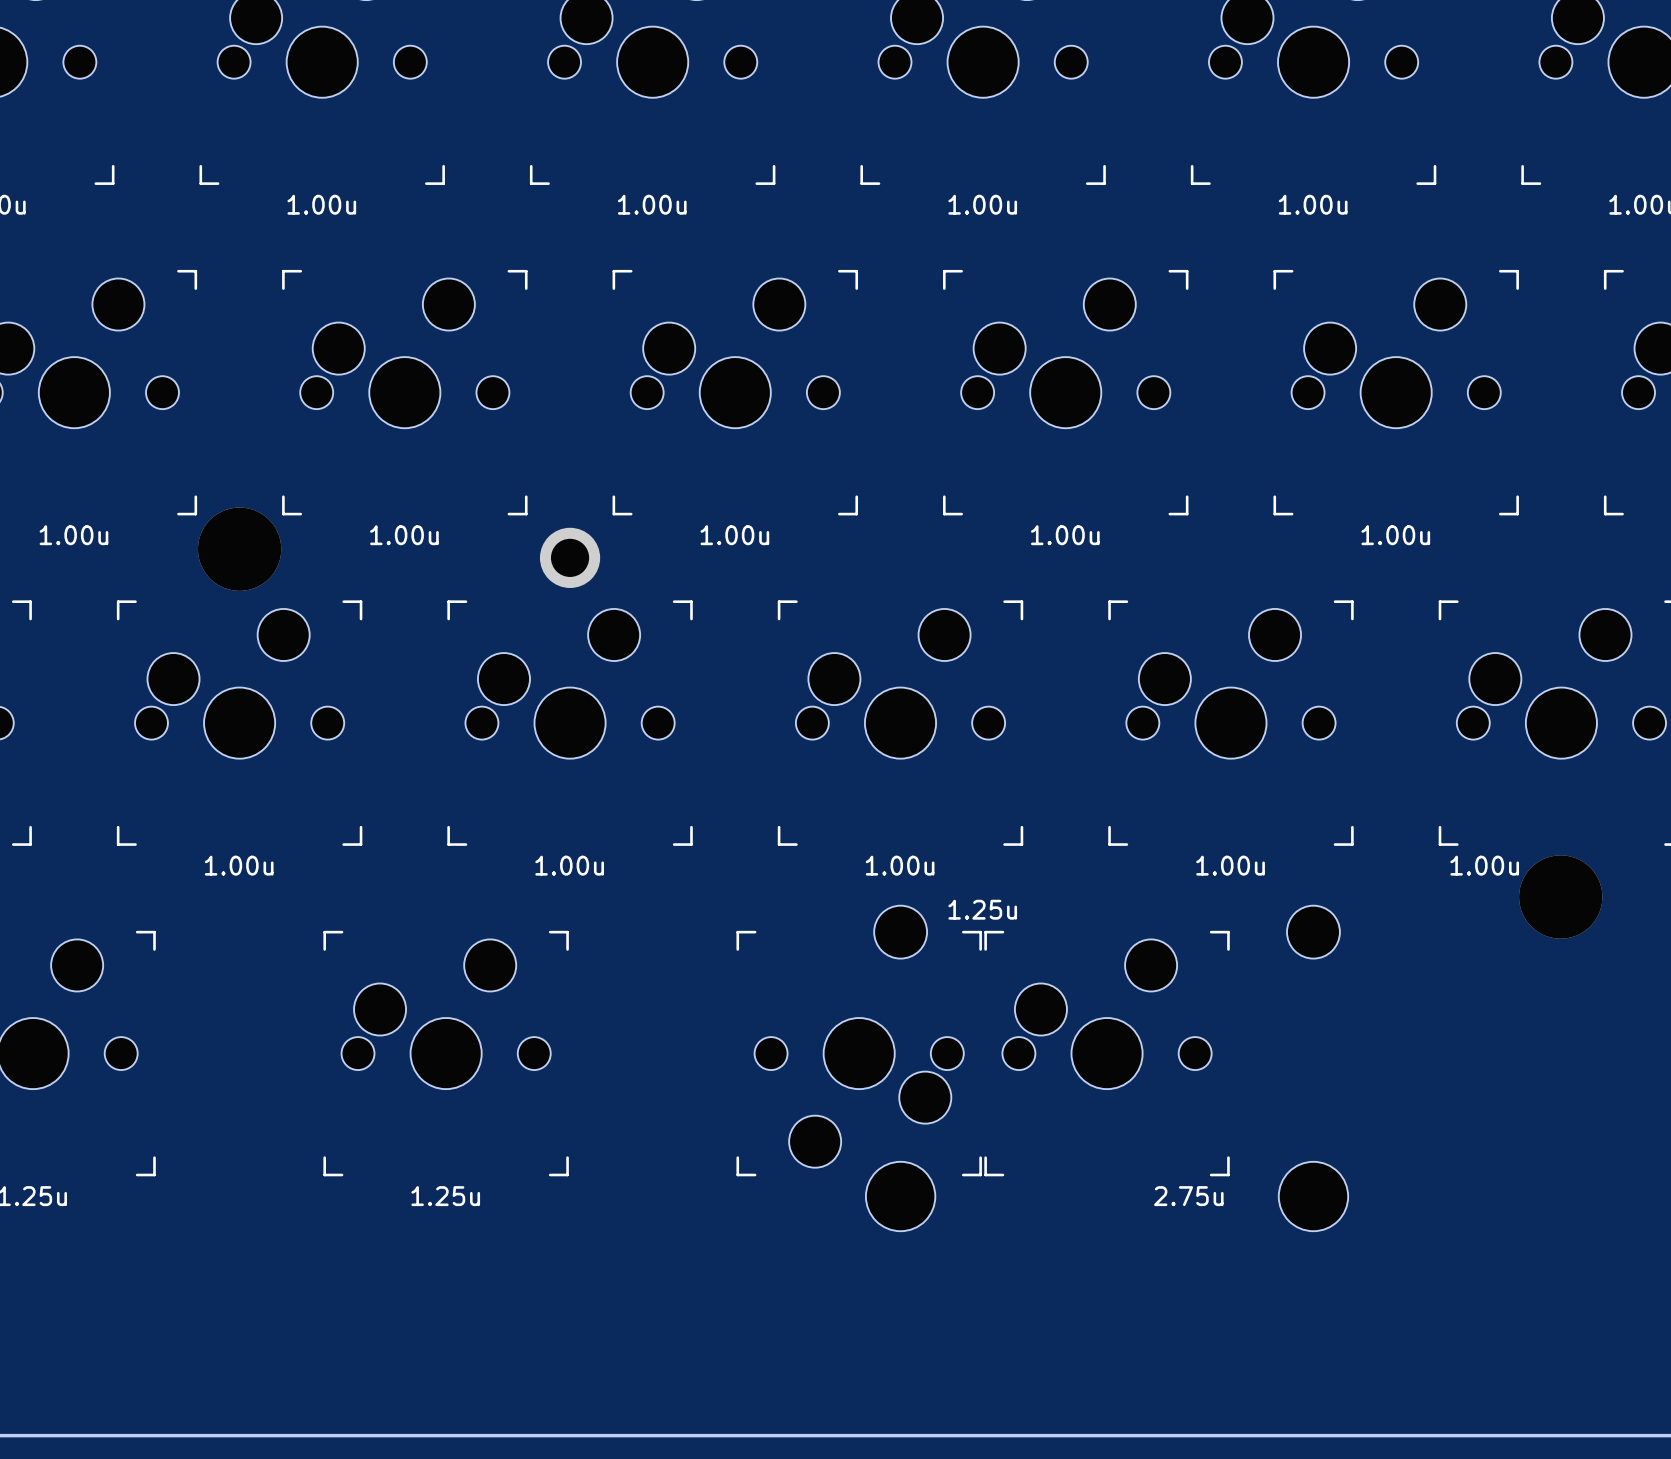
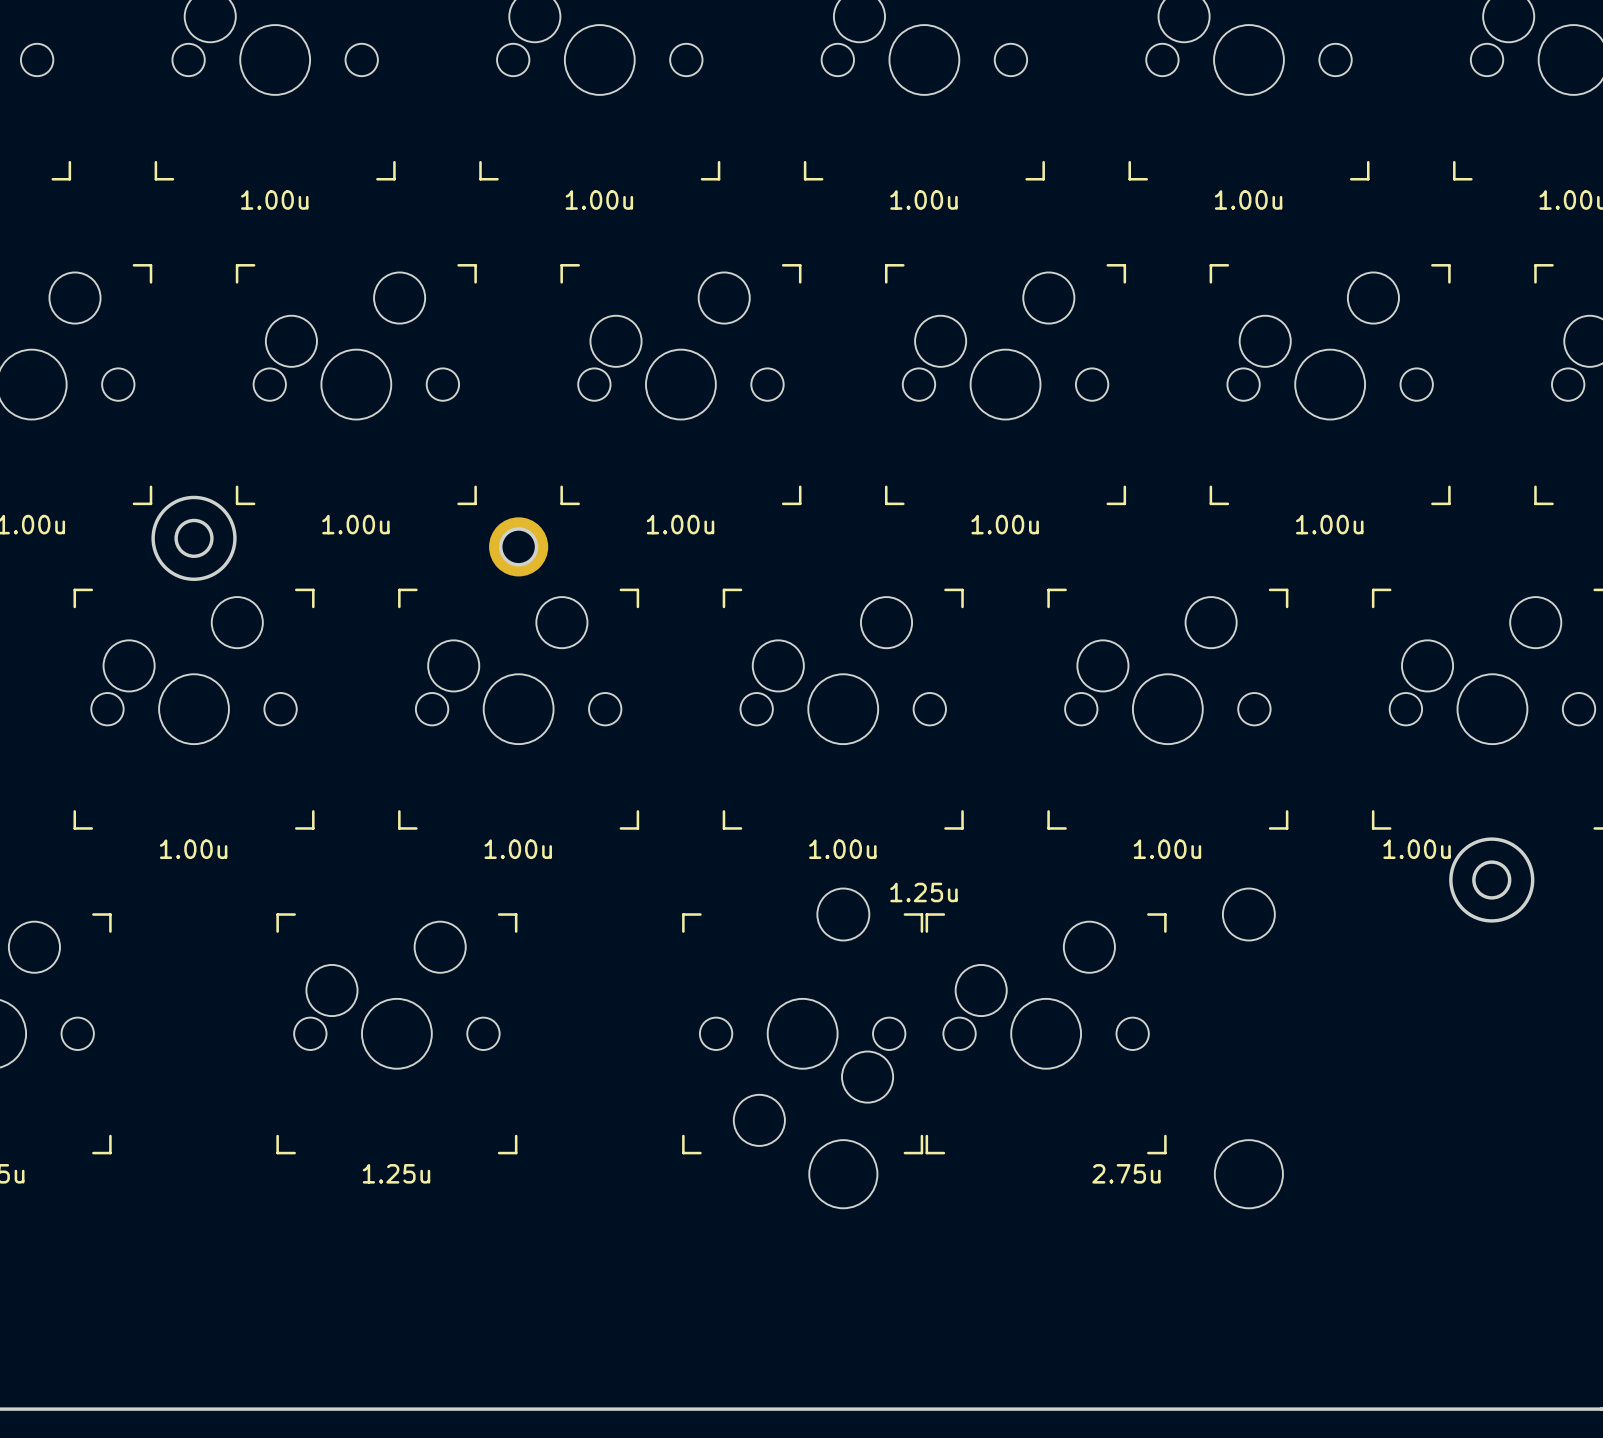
round board edge: none -> [151, 495, 237, 581]
round board edge: none -> [174, 518, 214, 558]
round board edge: none -> [499, 527, 539, 567]
round board edge: none -> [1449, 837, 1535, 923]
round board edge: none -> [1472, 860, 1512, 900]

